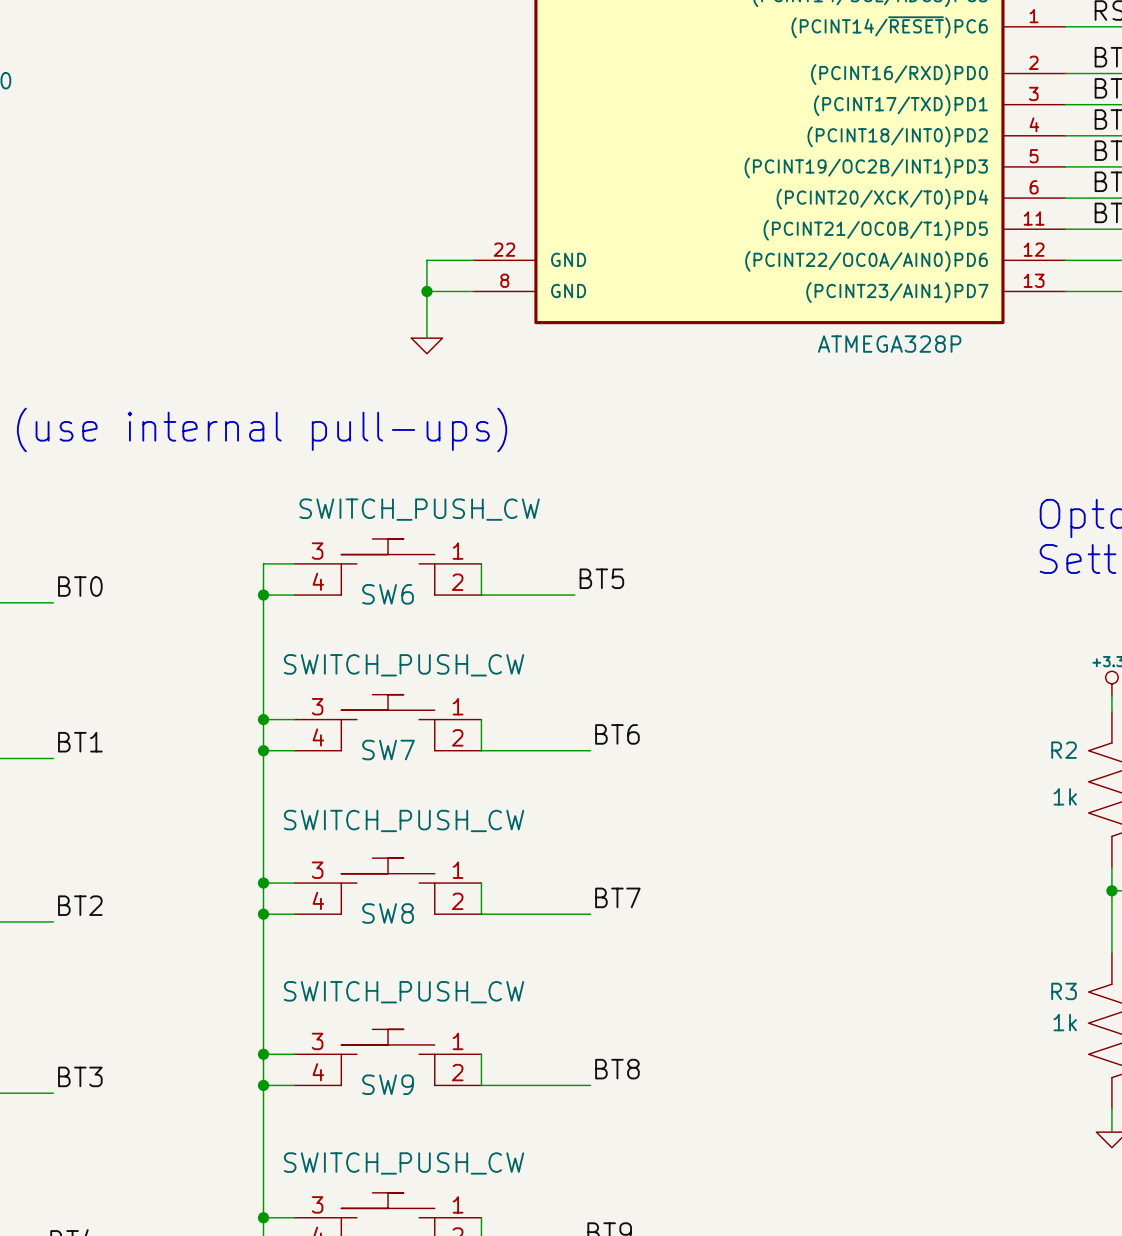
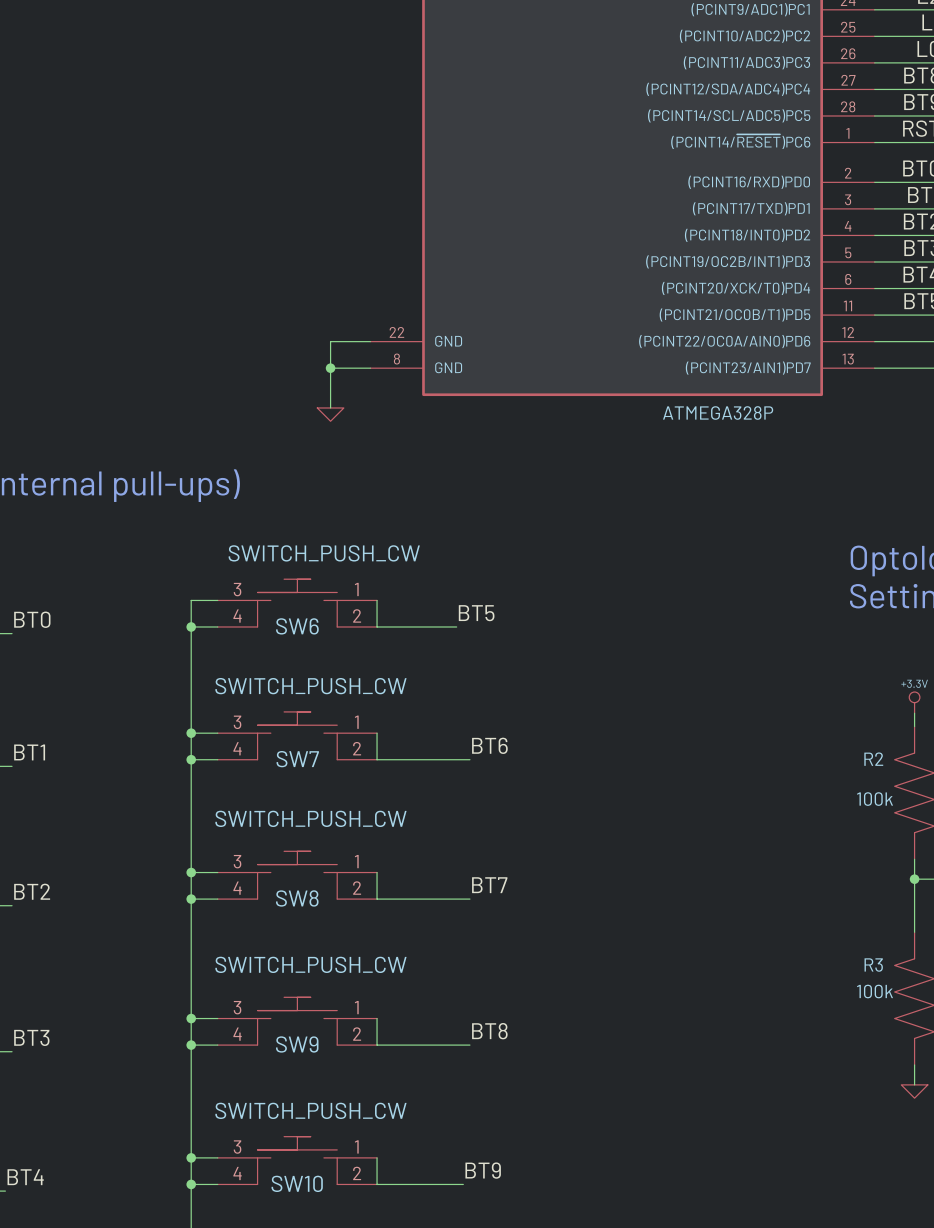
R2 value: 1k (1065, 796) -> 100k (875, 799)
R3 value: 1k (1065, 1022) -> 100k (875, 991)

